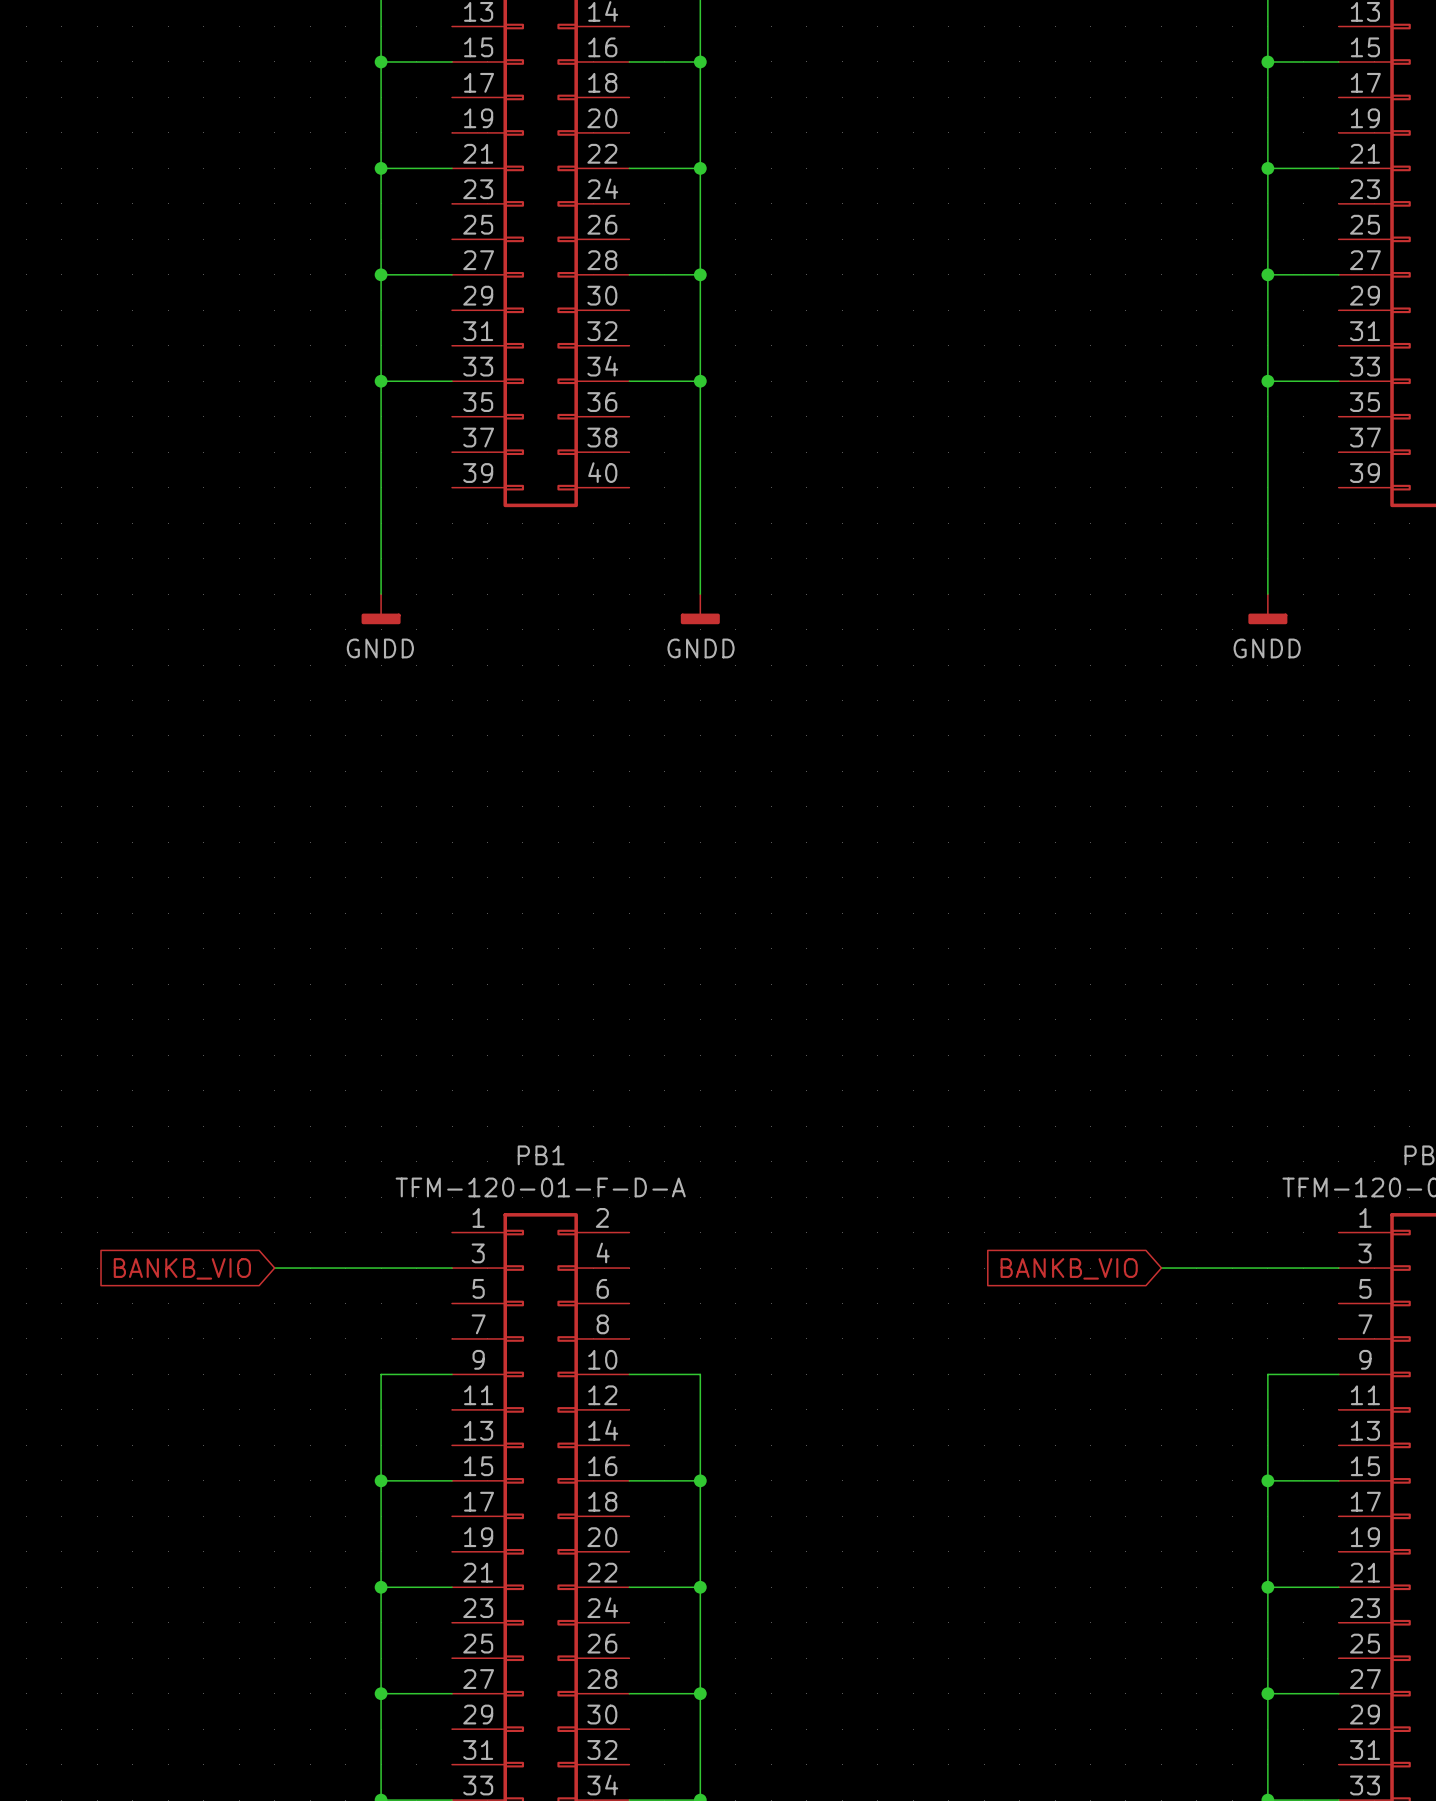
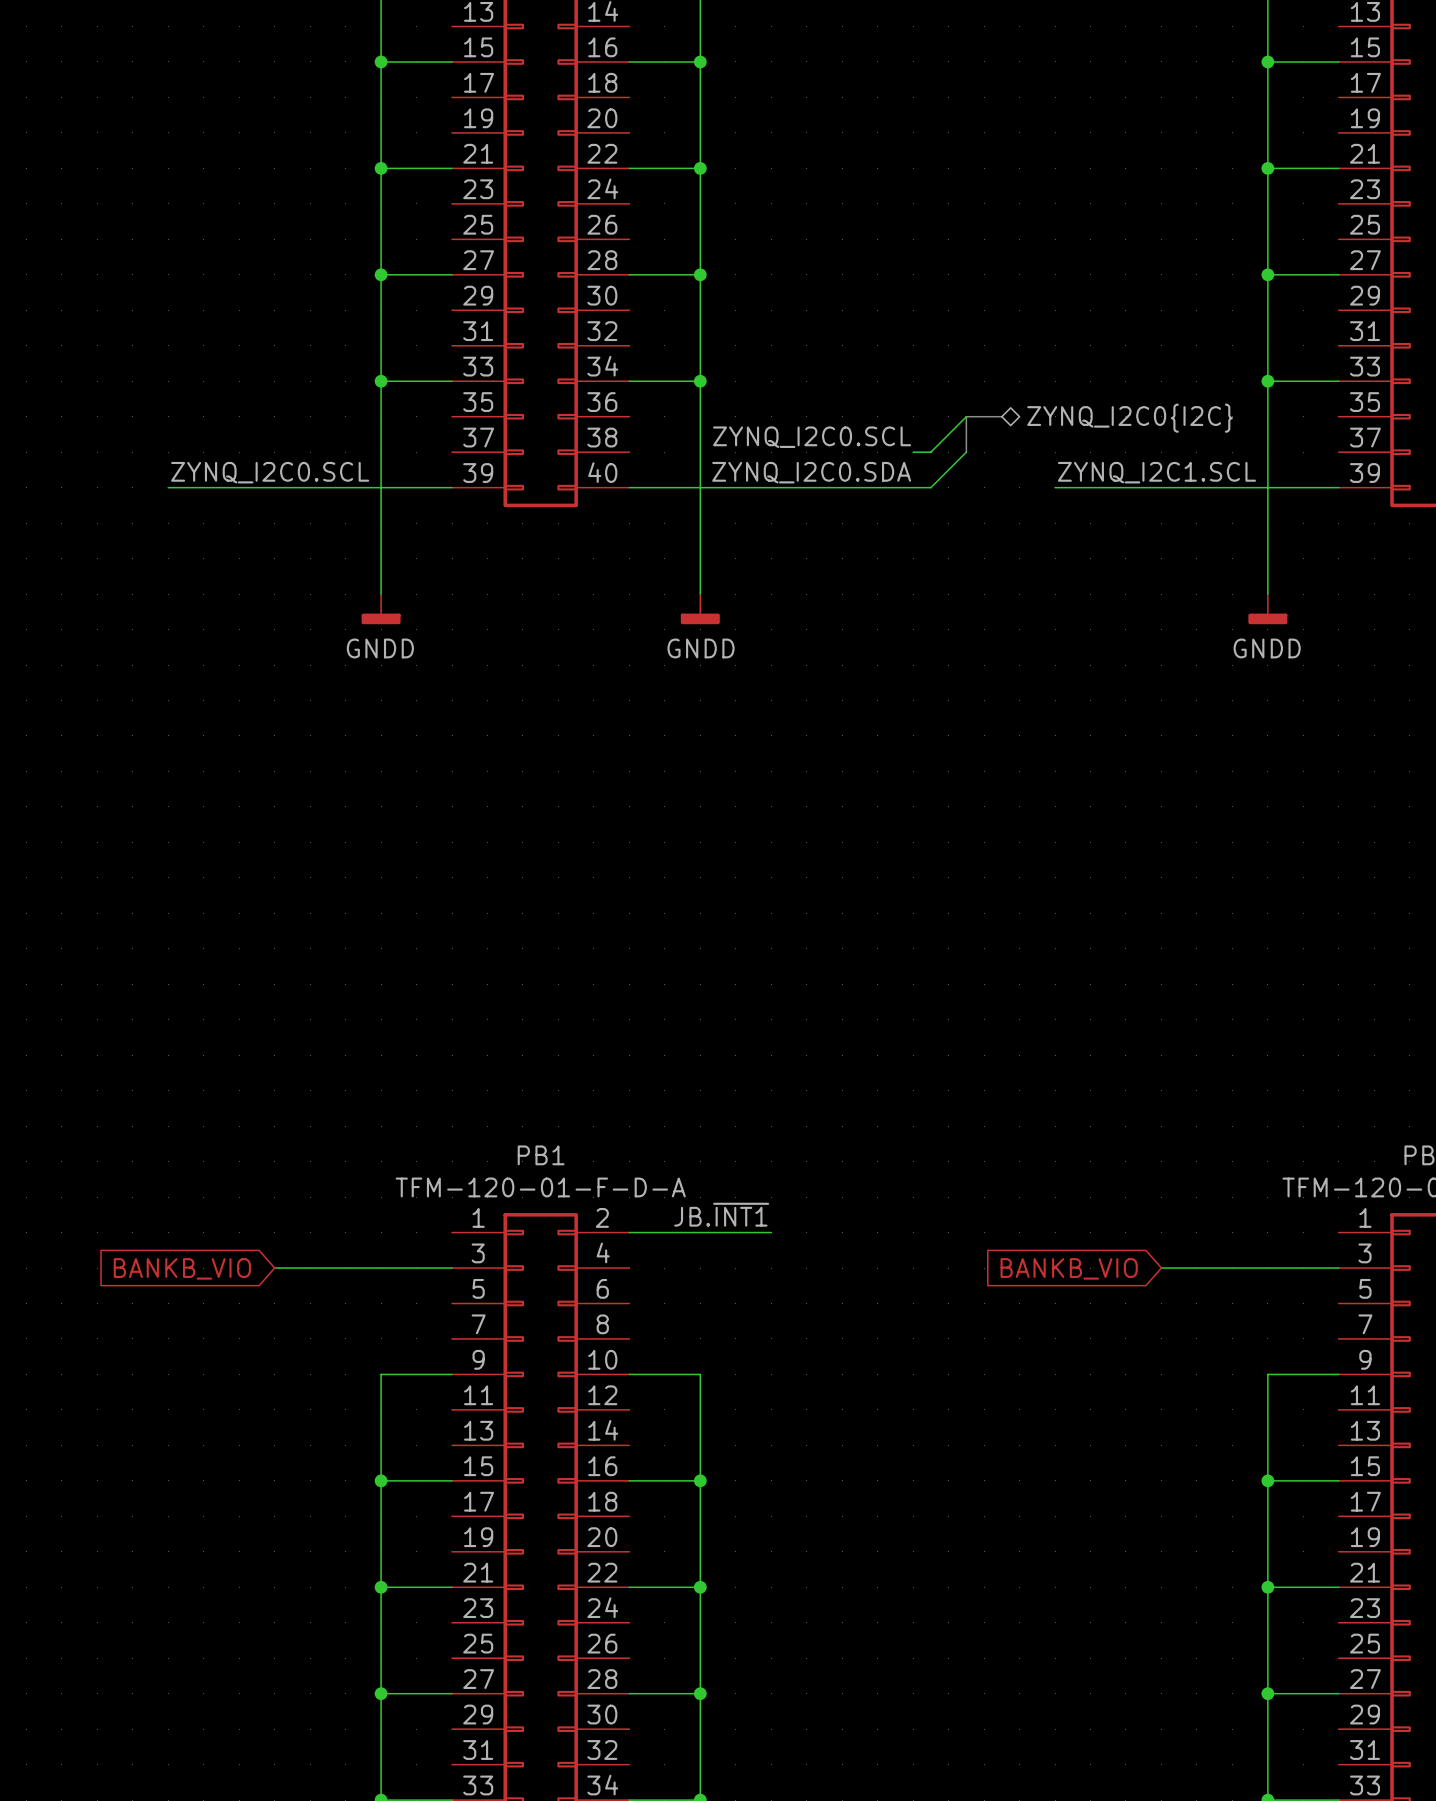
wire: none -> (966, 416) (930, 452) (913, 452)
bus: none -> (1001, 416) (966, 416) (966, 452)
hierarchical label: none -> ZYNQ_I2C0{I2C} (1130, 418)
label: none -> ZYNQ_I2C0.SCL (812, 437)
wire: none -> (966, 452) (930, 487) (629, 487)
label: none -> ZYNQ_I2C0.SCL (270, 472)
label: none -> ZYNQ_I2C0.SDA (811, 472)
label: none -> ZYNQ_I2C1.SCL (1156, 472)
wire: none -> (168, 487) (452, 487)
wire: none -> (1055, 487) (1338, 487)
label: none -> JB.~{INT1} (721, 1214)
wire: none -> (629, 1232) (771, 1232)

